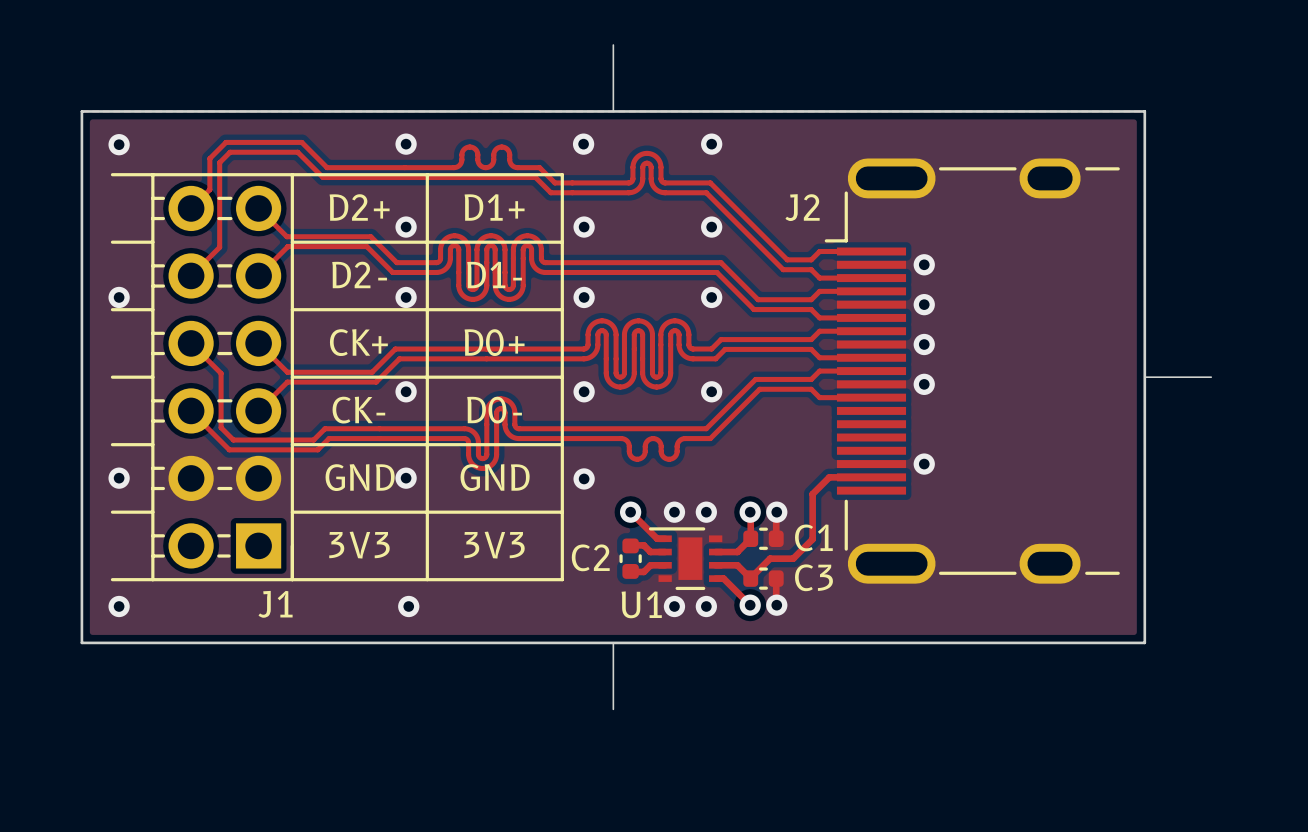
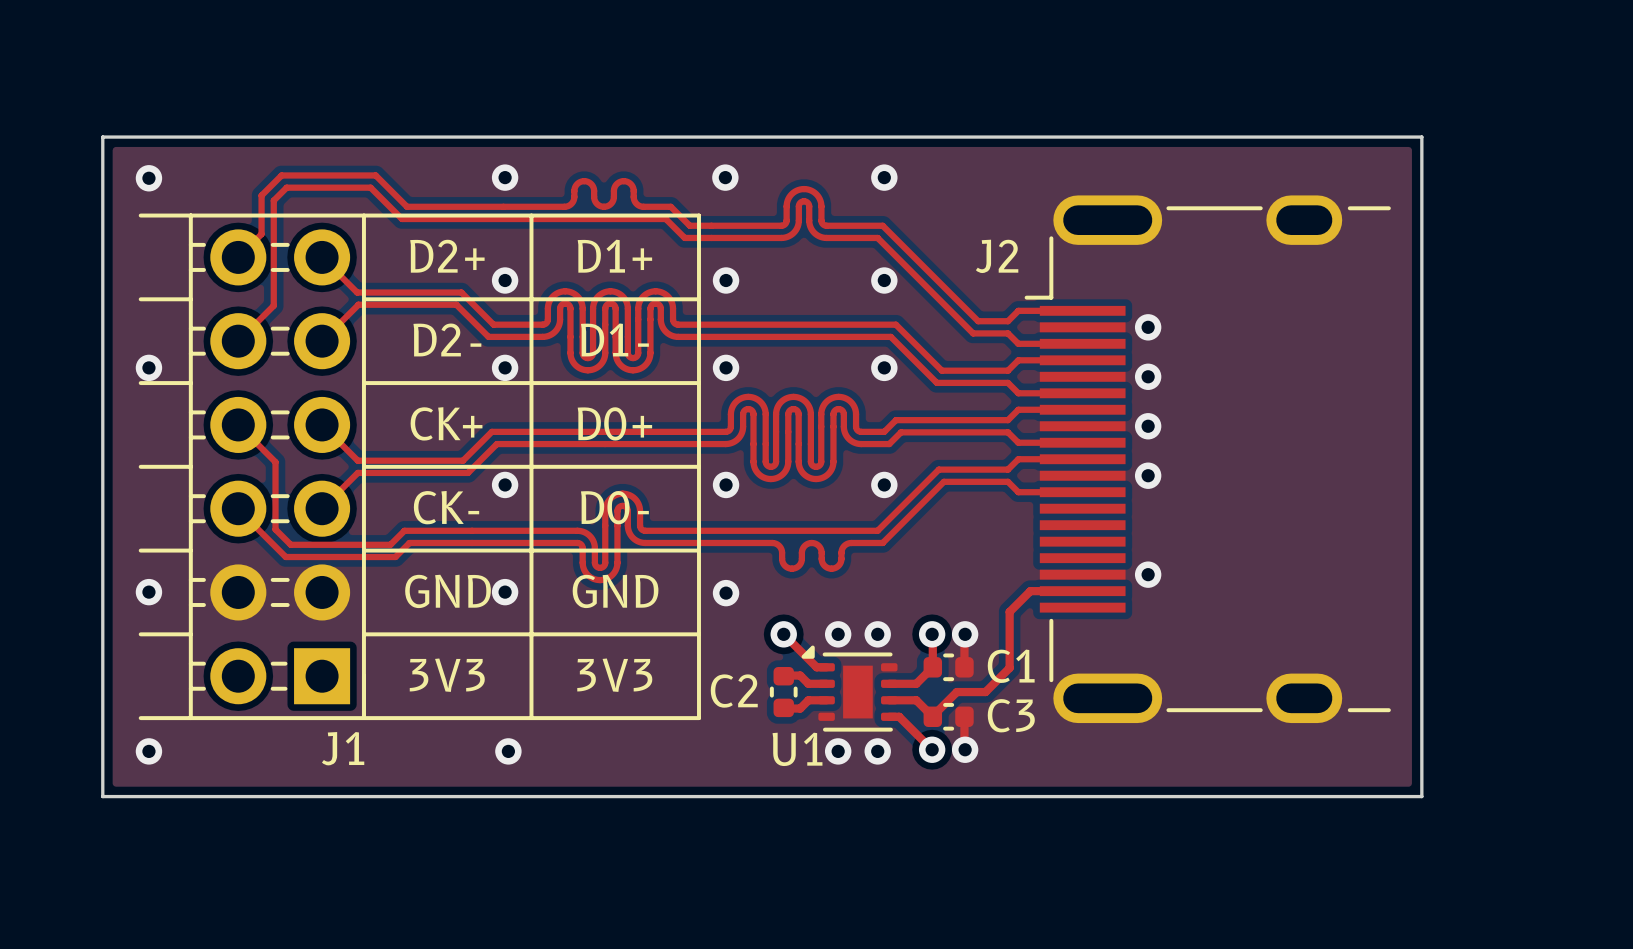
board edge: (613, 45) (613, 111) -> none
board edge: (1144, 377) (1211, 377) -> none
U1 footprint: [648, 527, 723, 591] -> [801, 645, 898, 732]
board edge: (613, 642) (613, 709) -> none

